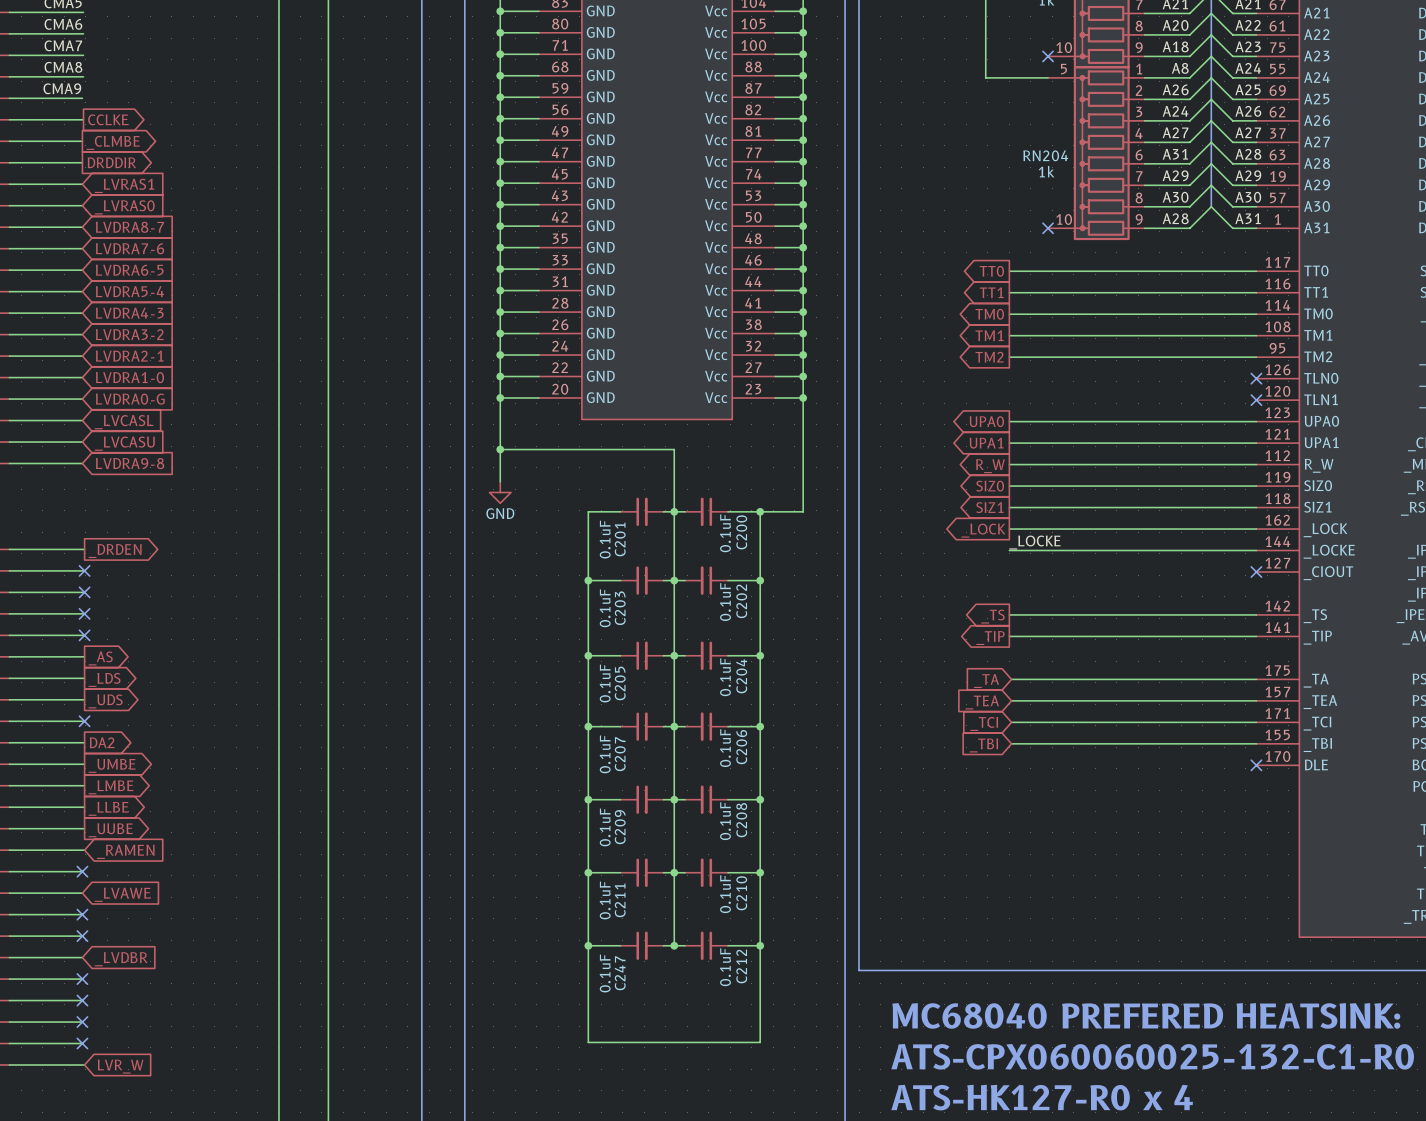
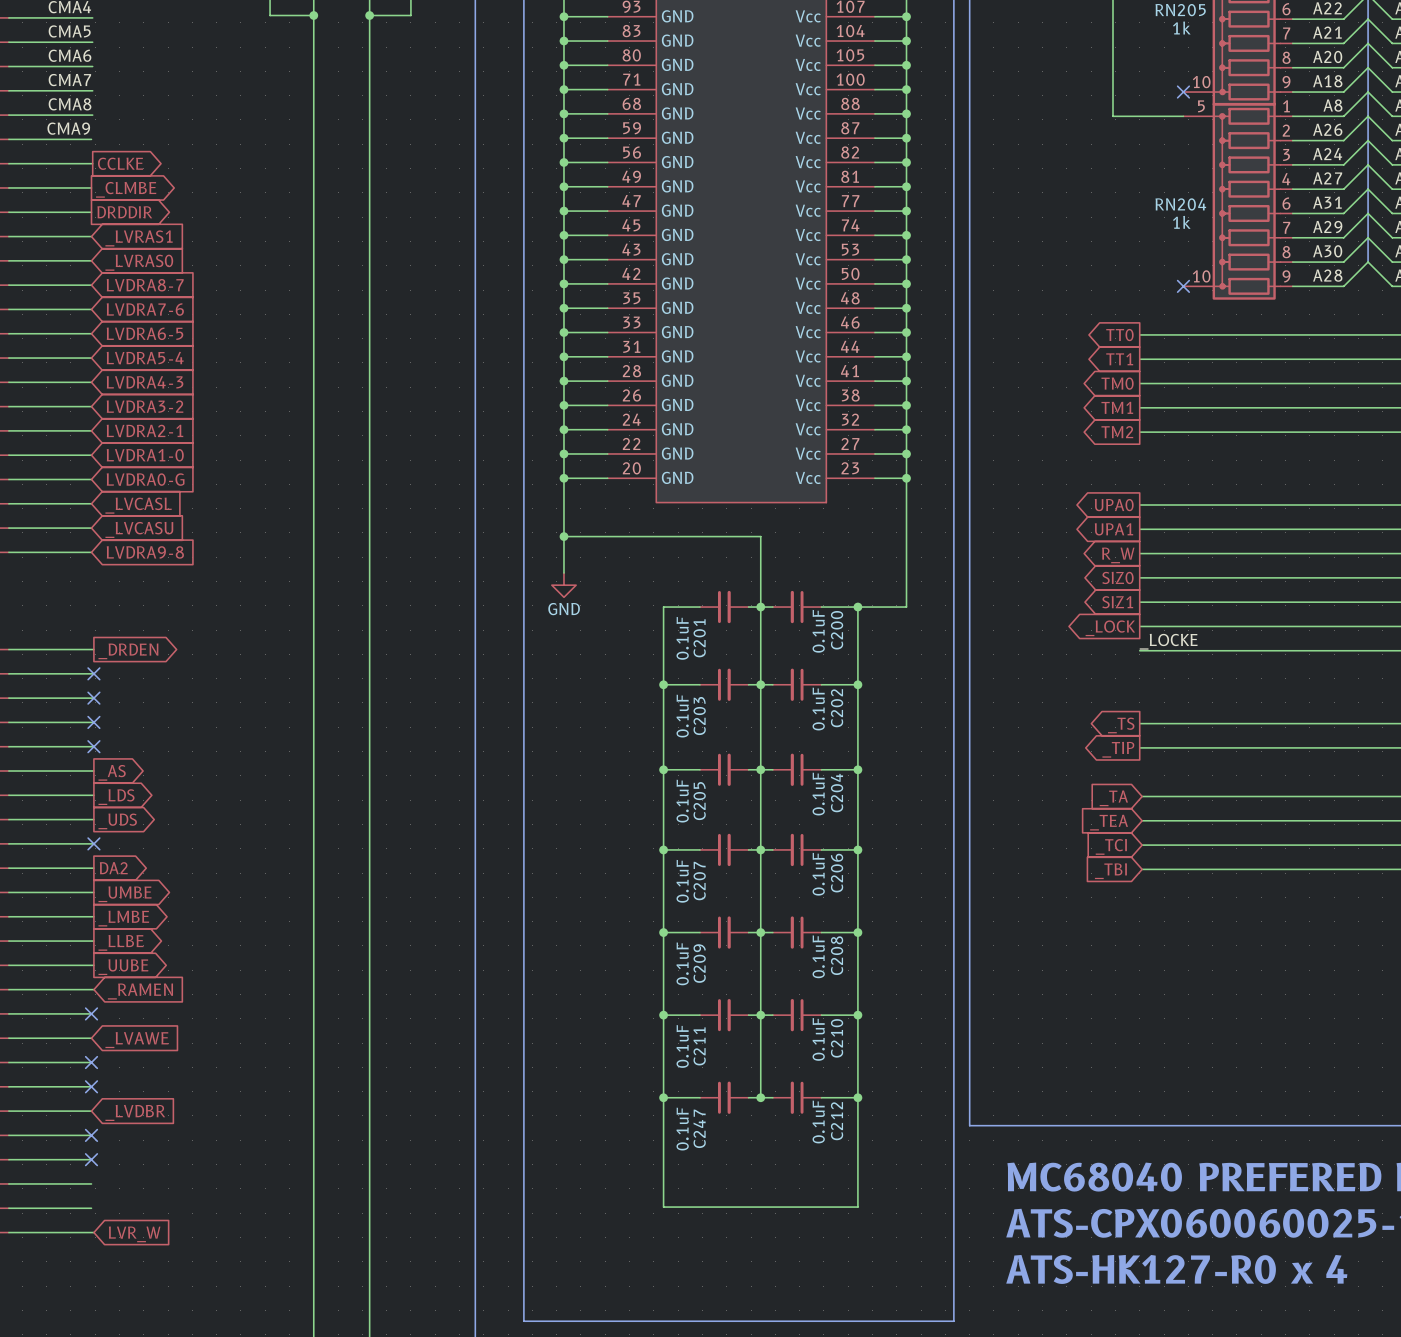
no-connect mark: (82, 1022) -> none
no-connect mark: (82, 1043) -> none

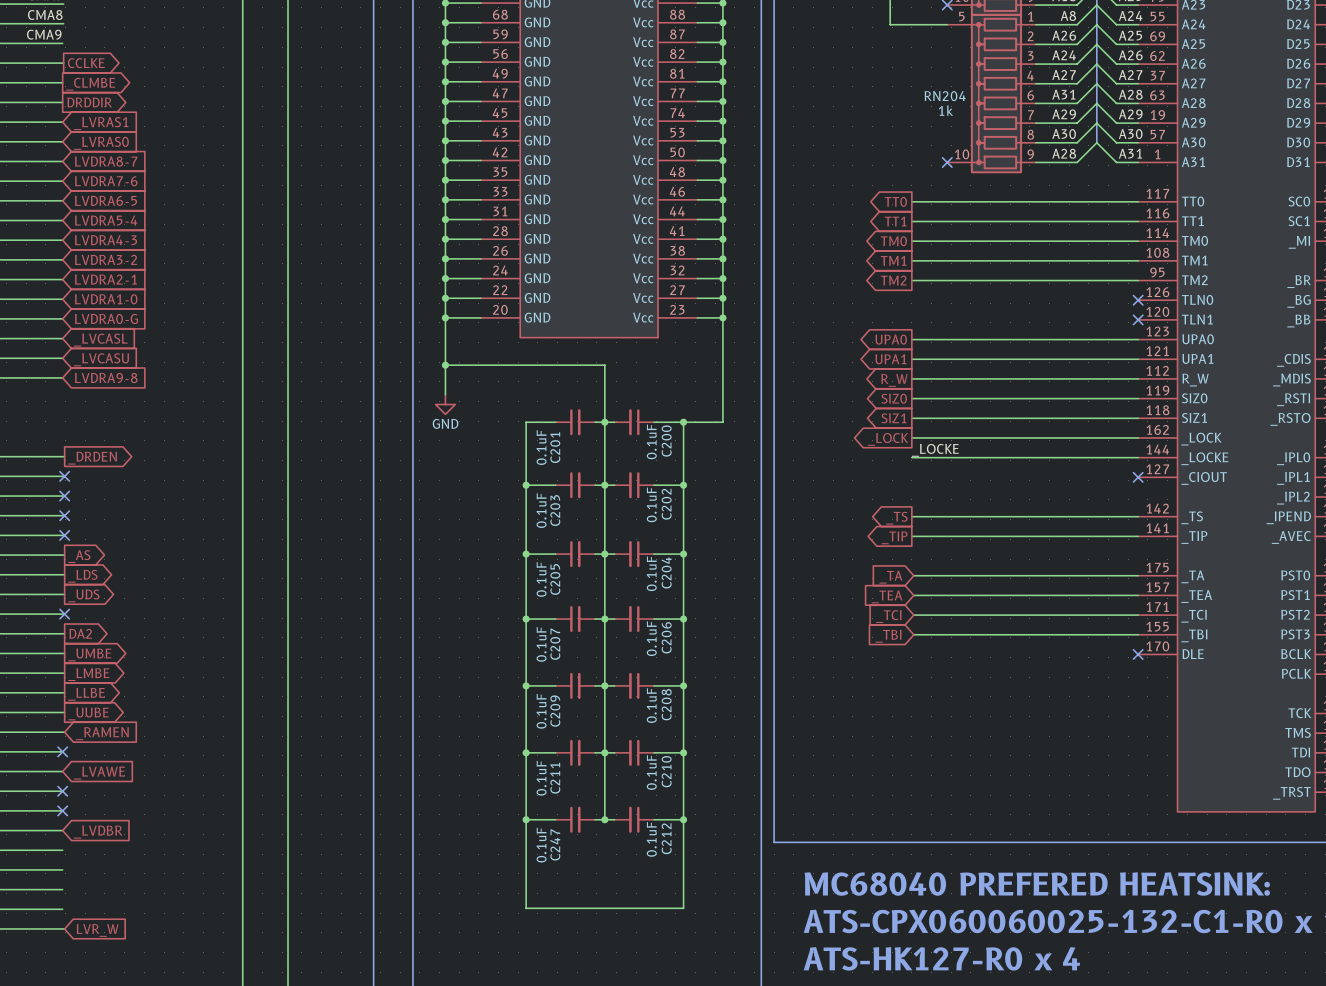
no-connect mark: (91, 1135) -> none
no-connect mark: (91, 1159) -> none

